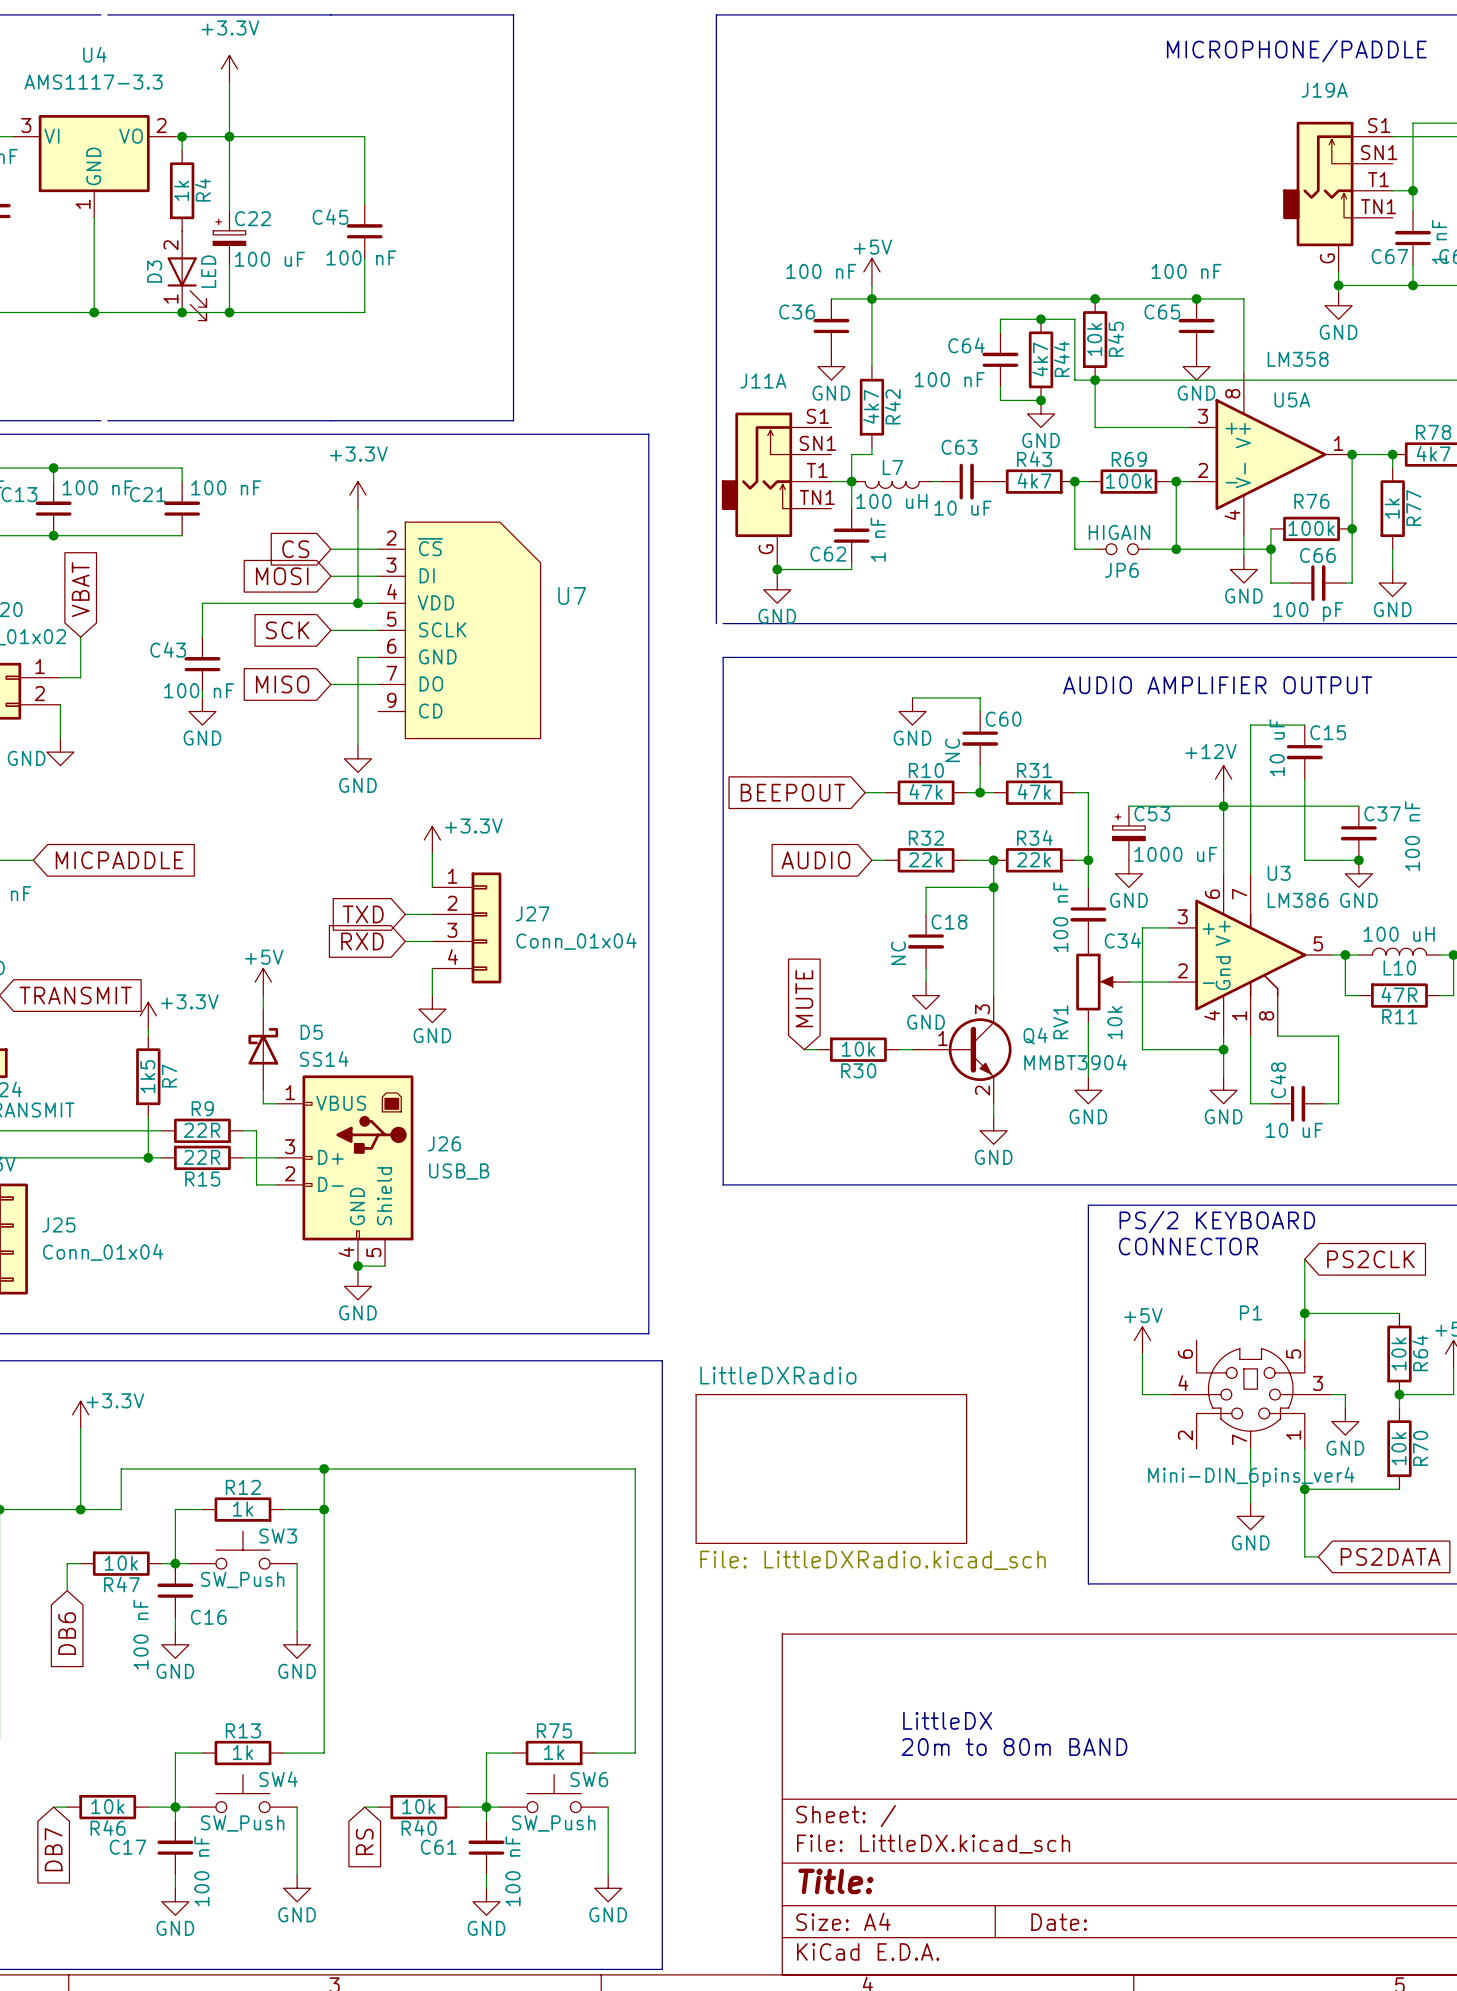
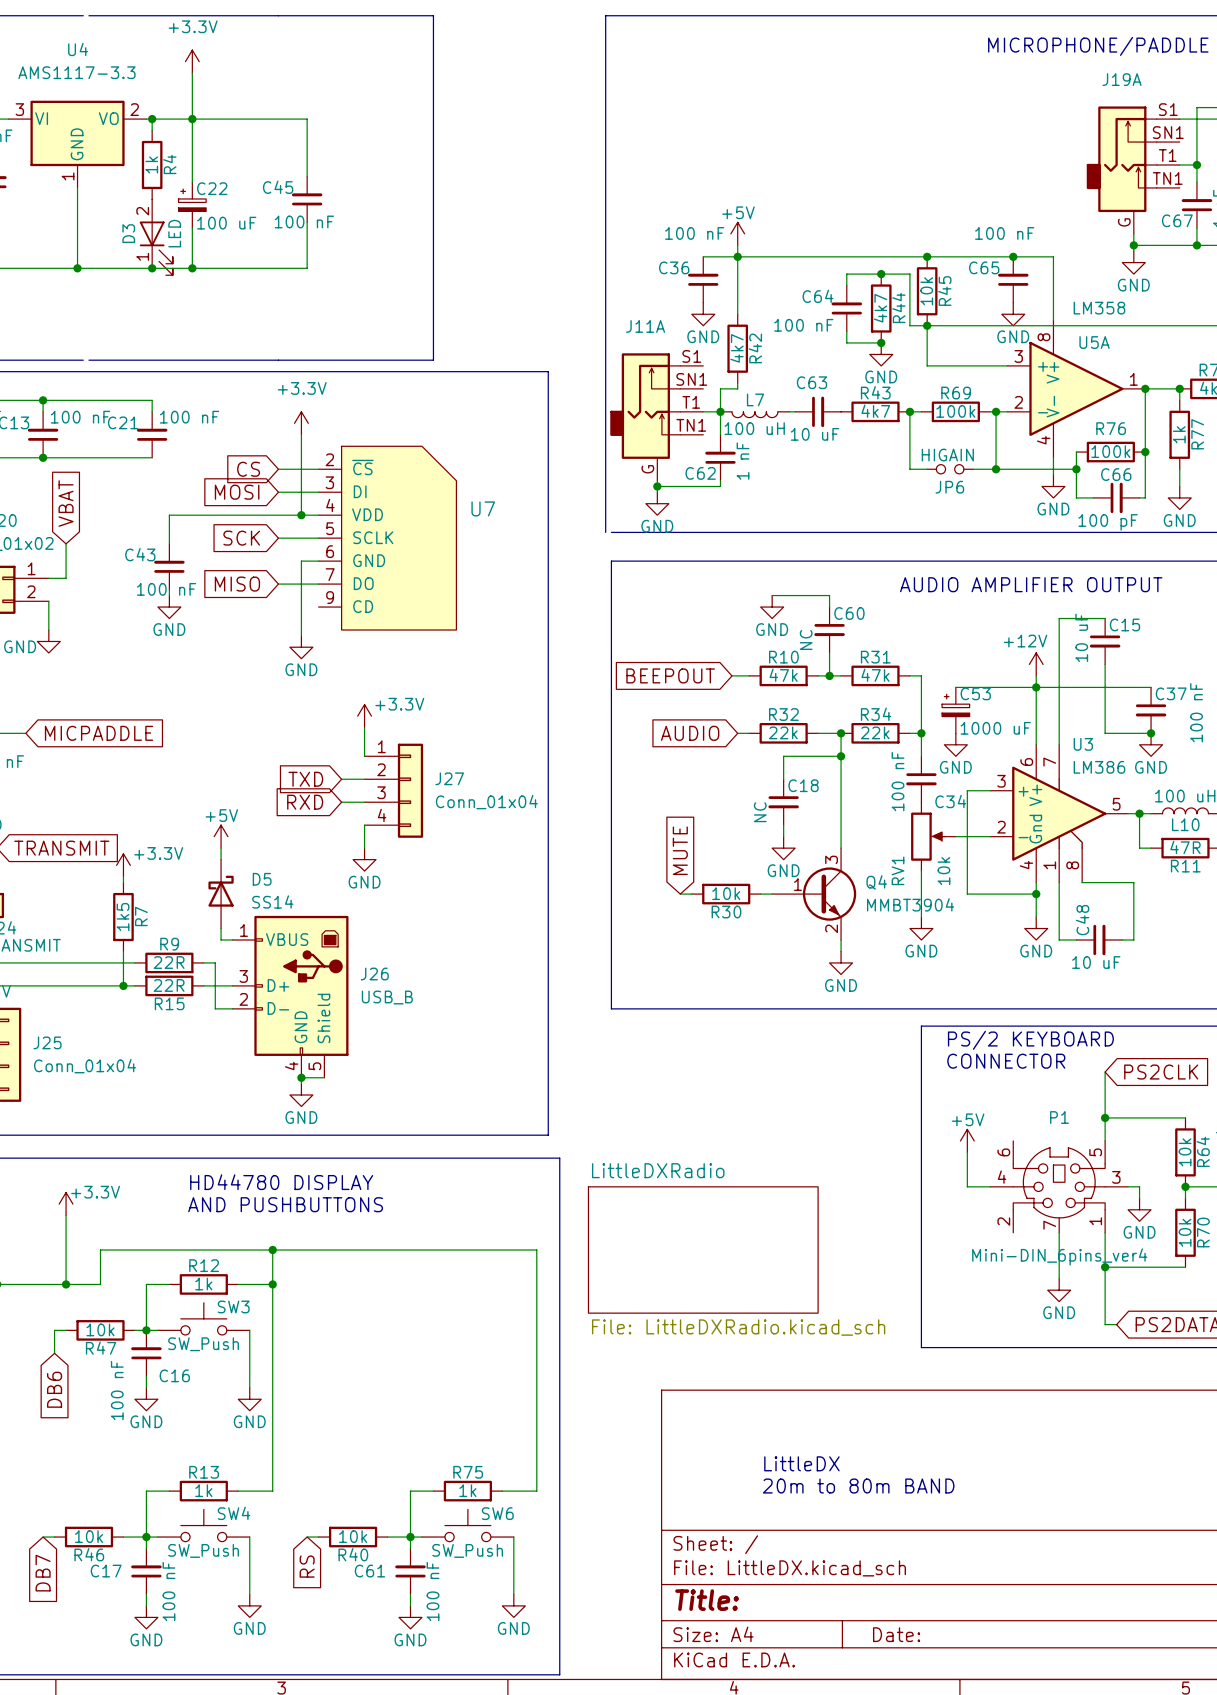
text: none -> HD44780 DISPLAY (281, 1182)
text: none -> AND PUSHBUTTONS (285, 1204)

